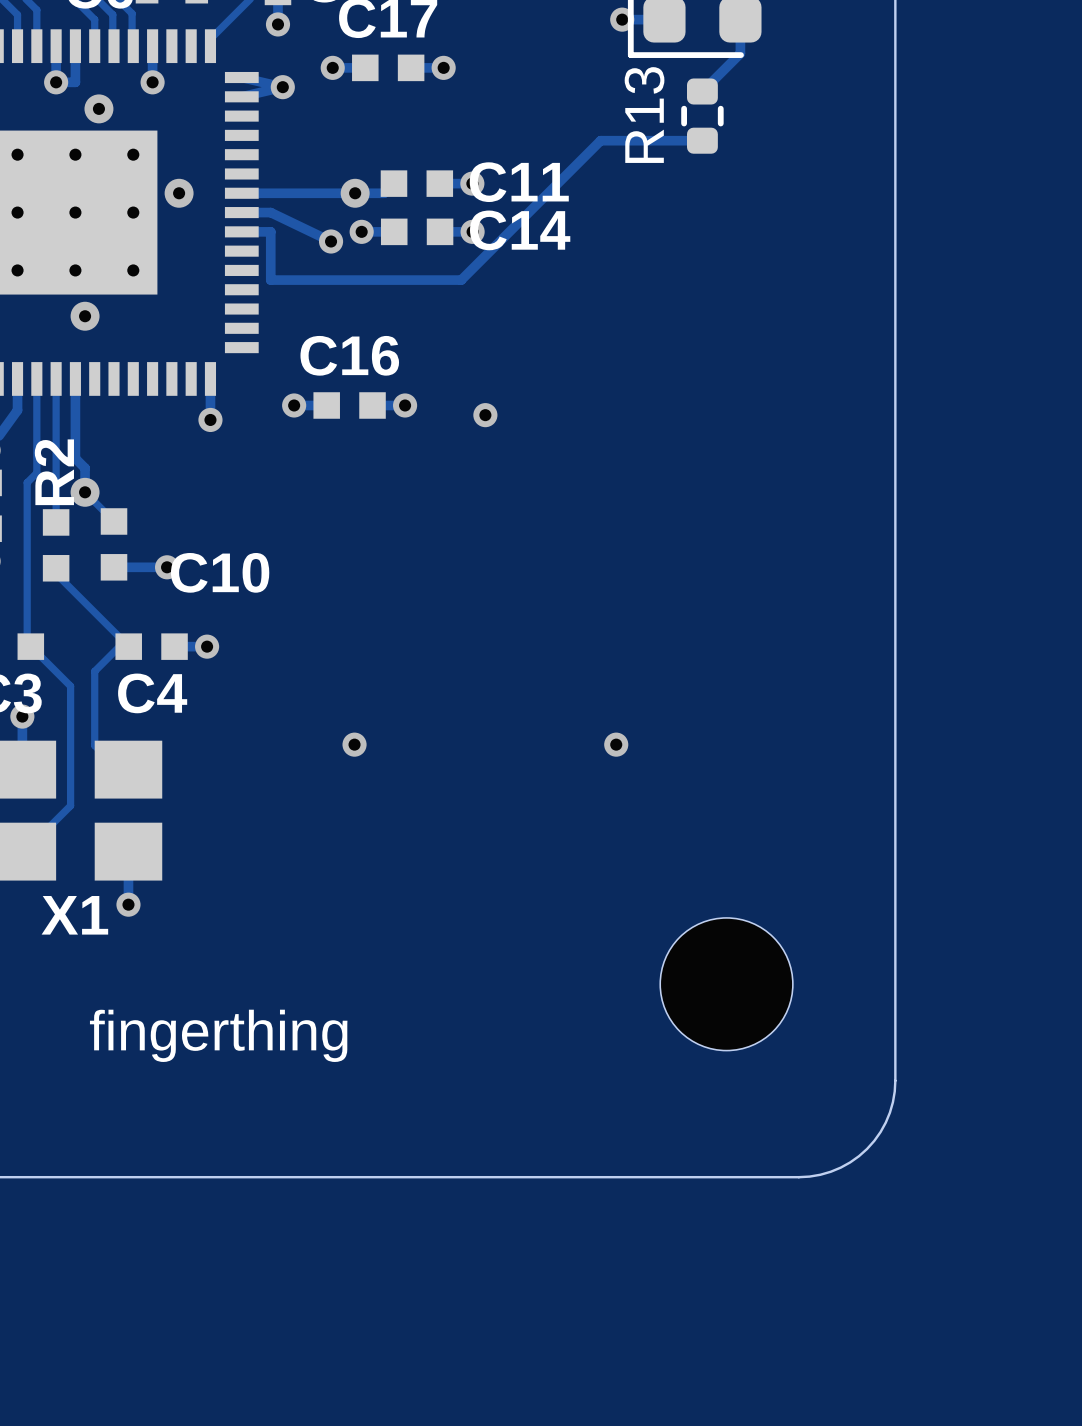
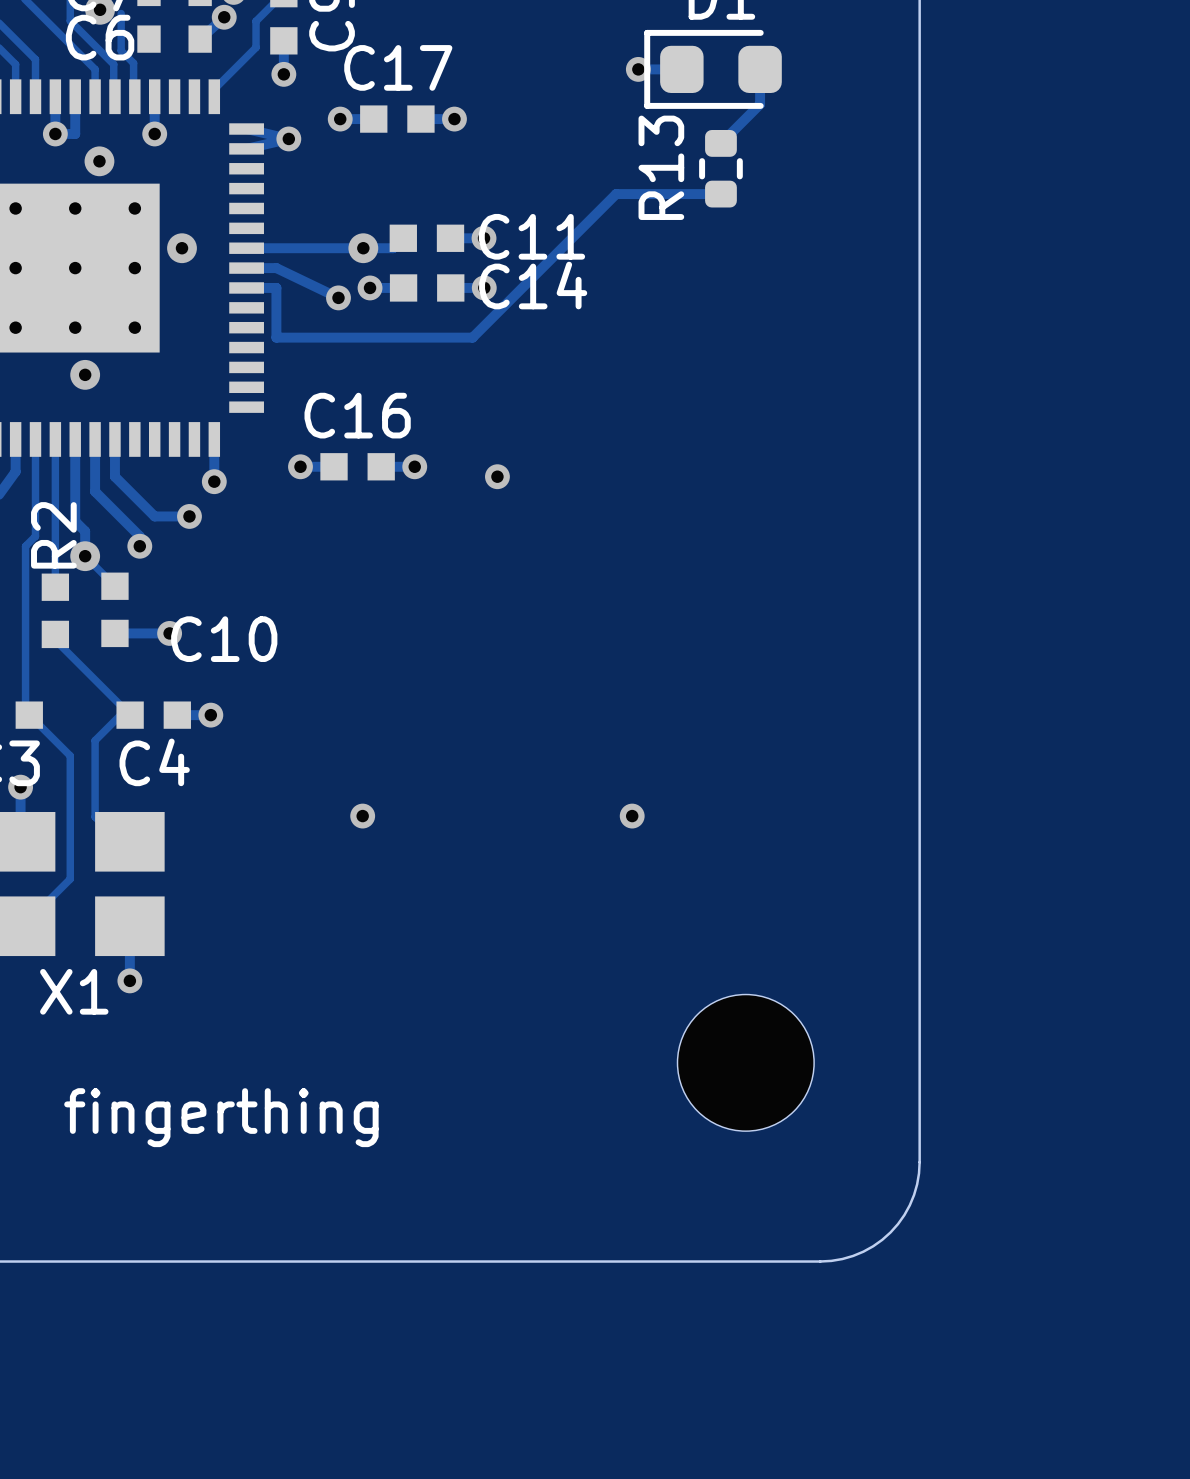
track: none -> (95, 439) (95, 491) (139, 536) (139, 546)
track: none -> (114, 439) (114, 476) (154, 516) (189, 516)
via: none -> (189, 516)
via: none -> (139, 546)

